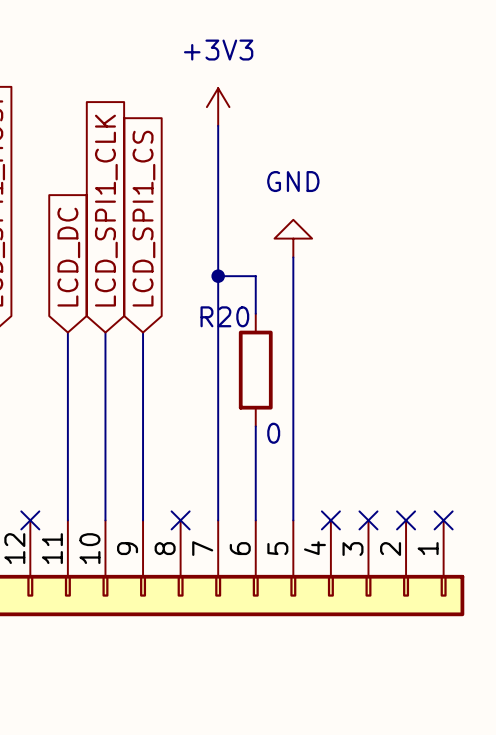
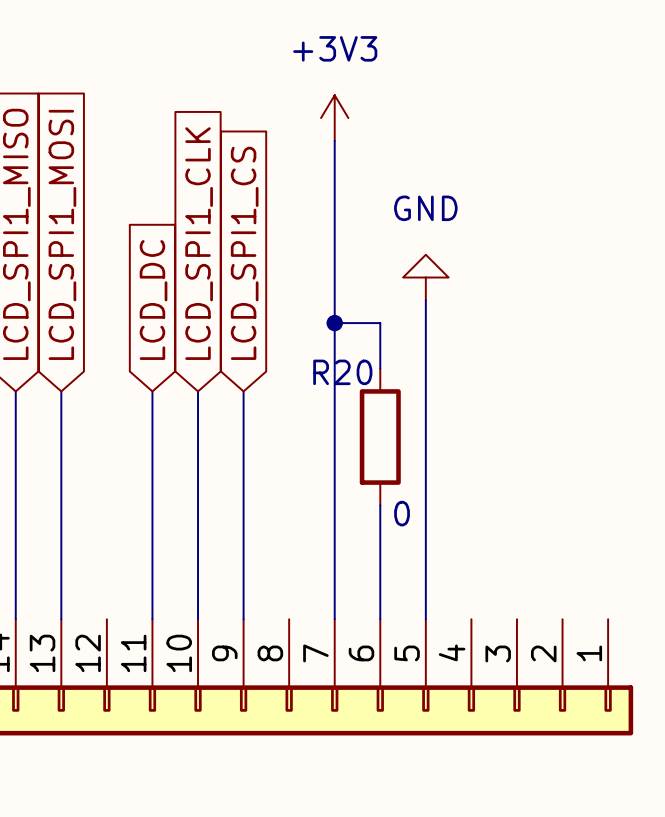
no-connect mark: (30, 520) -> none
no-connect mark: (180, 520) -> none
no-connect mark: (330, 520) -> none
no-connect mark: (368, 520) -> none
no-connect mark: (406, 520) -> none
no-connect mark: (443, 520) -> none

